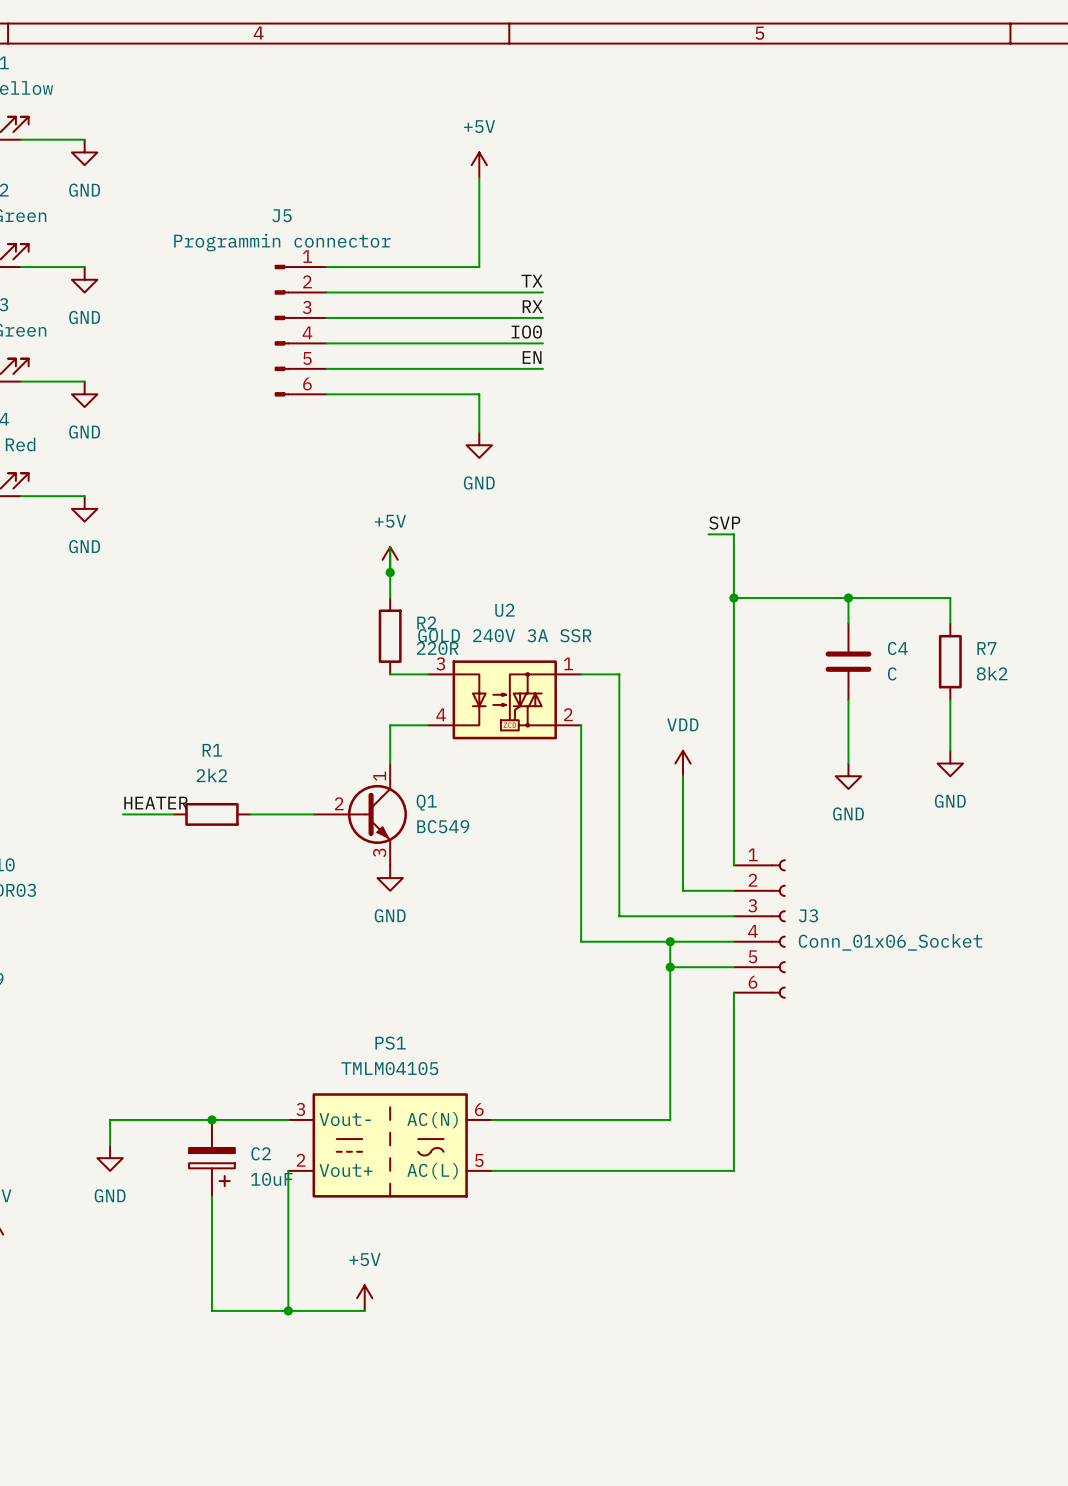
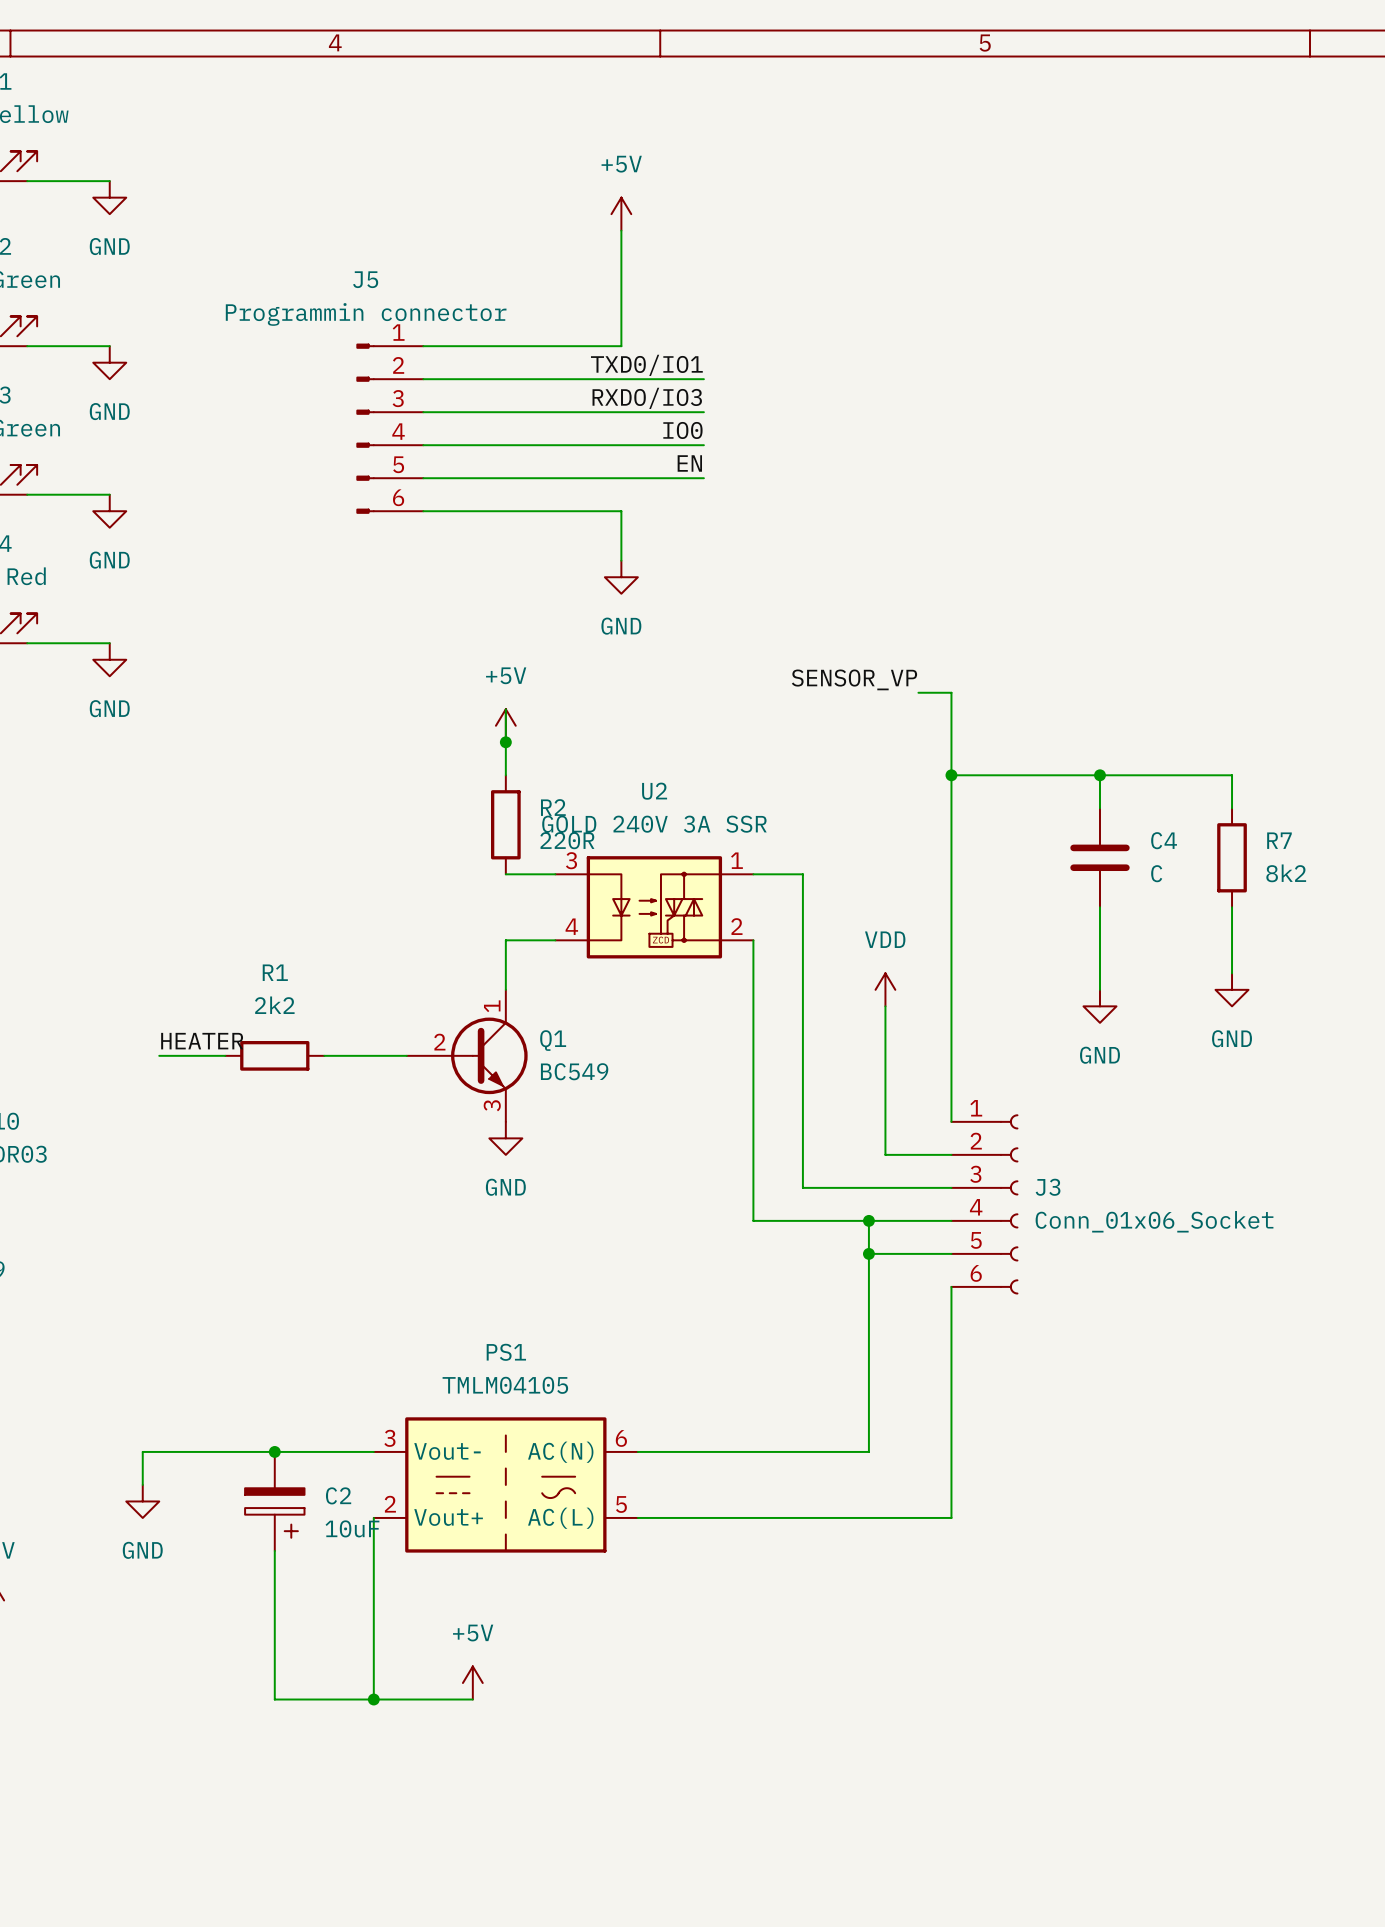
label: TX (532, 281) -> TXD0/IO1 (646, 365)
label: RX (532, 306) -> RXDO/IO3 (647, 398)
label: SVP (724, 523) -> SENSOR_VP (854, 679)

